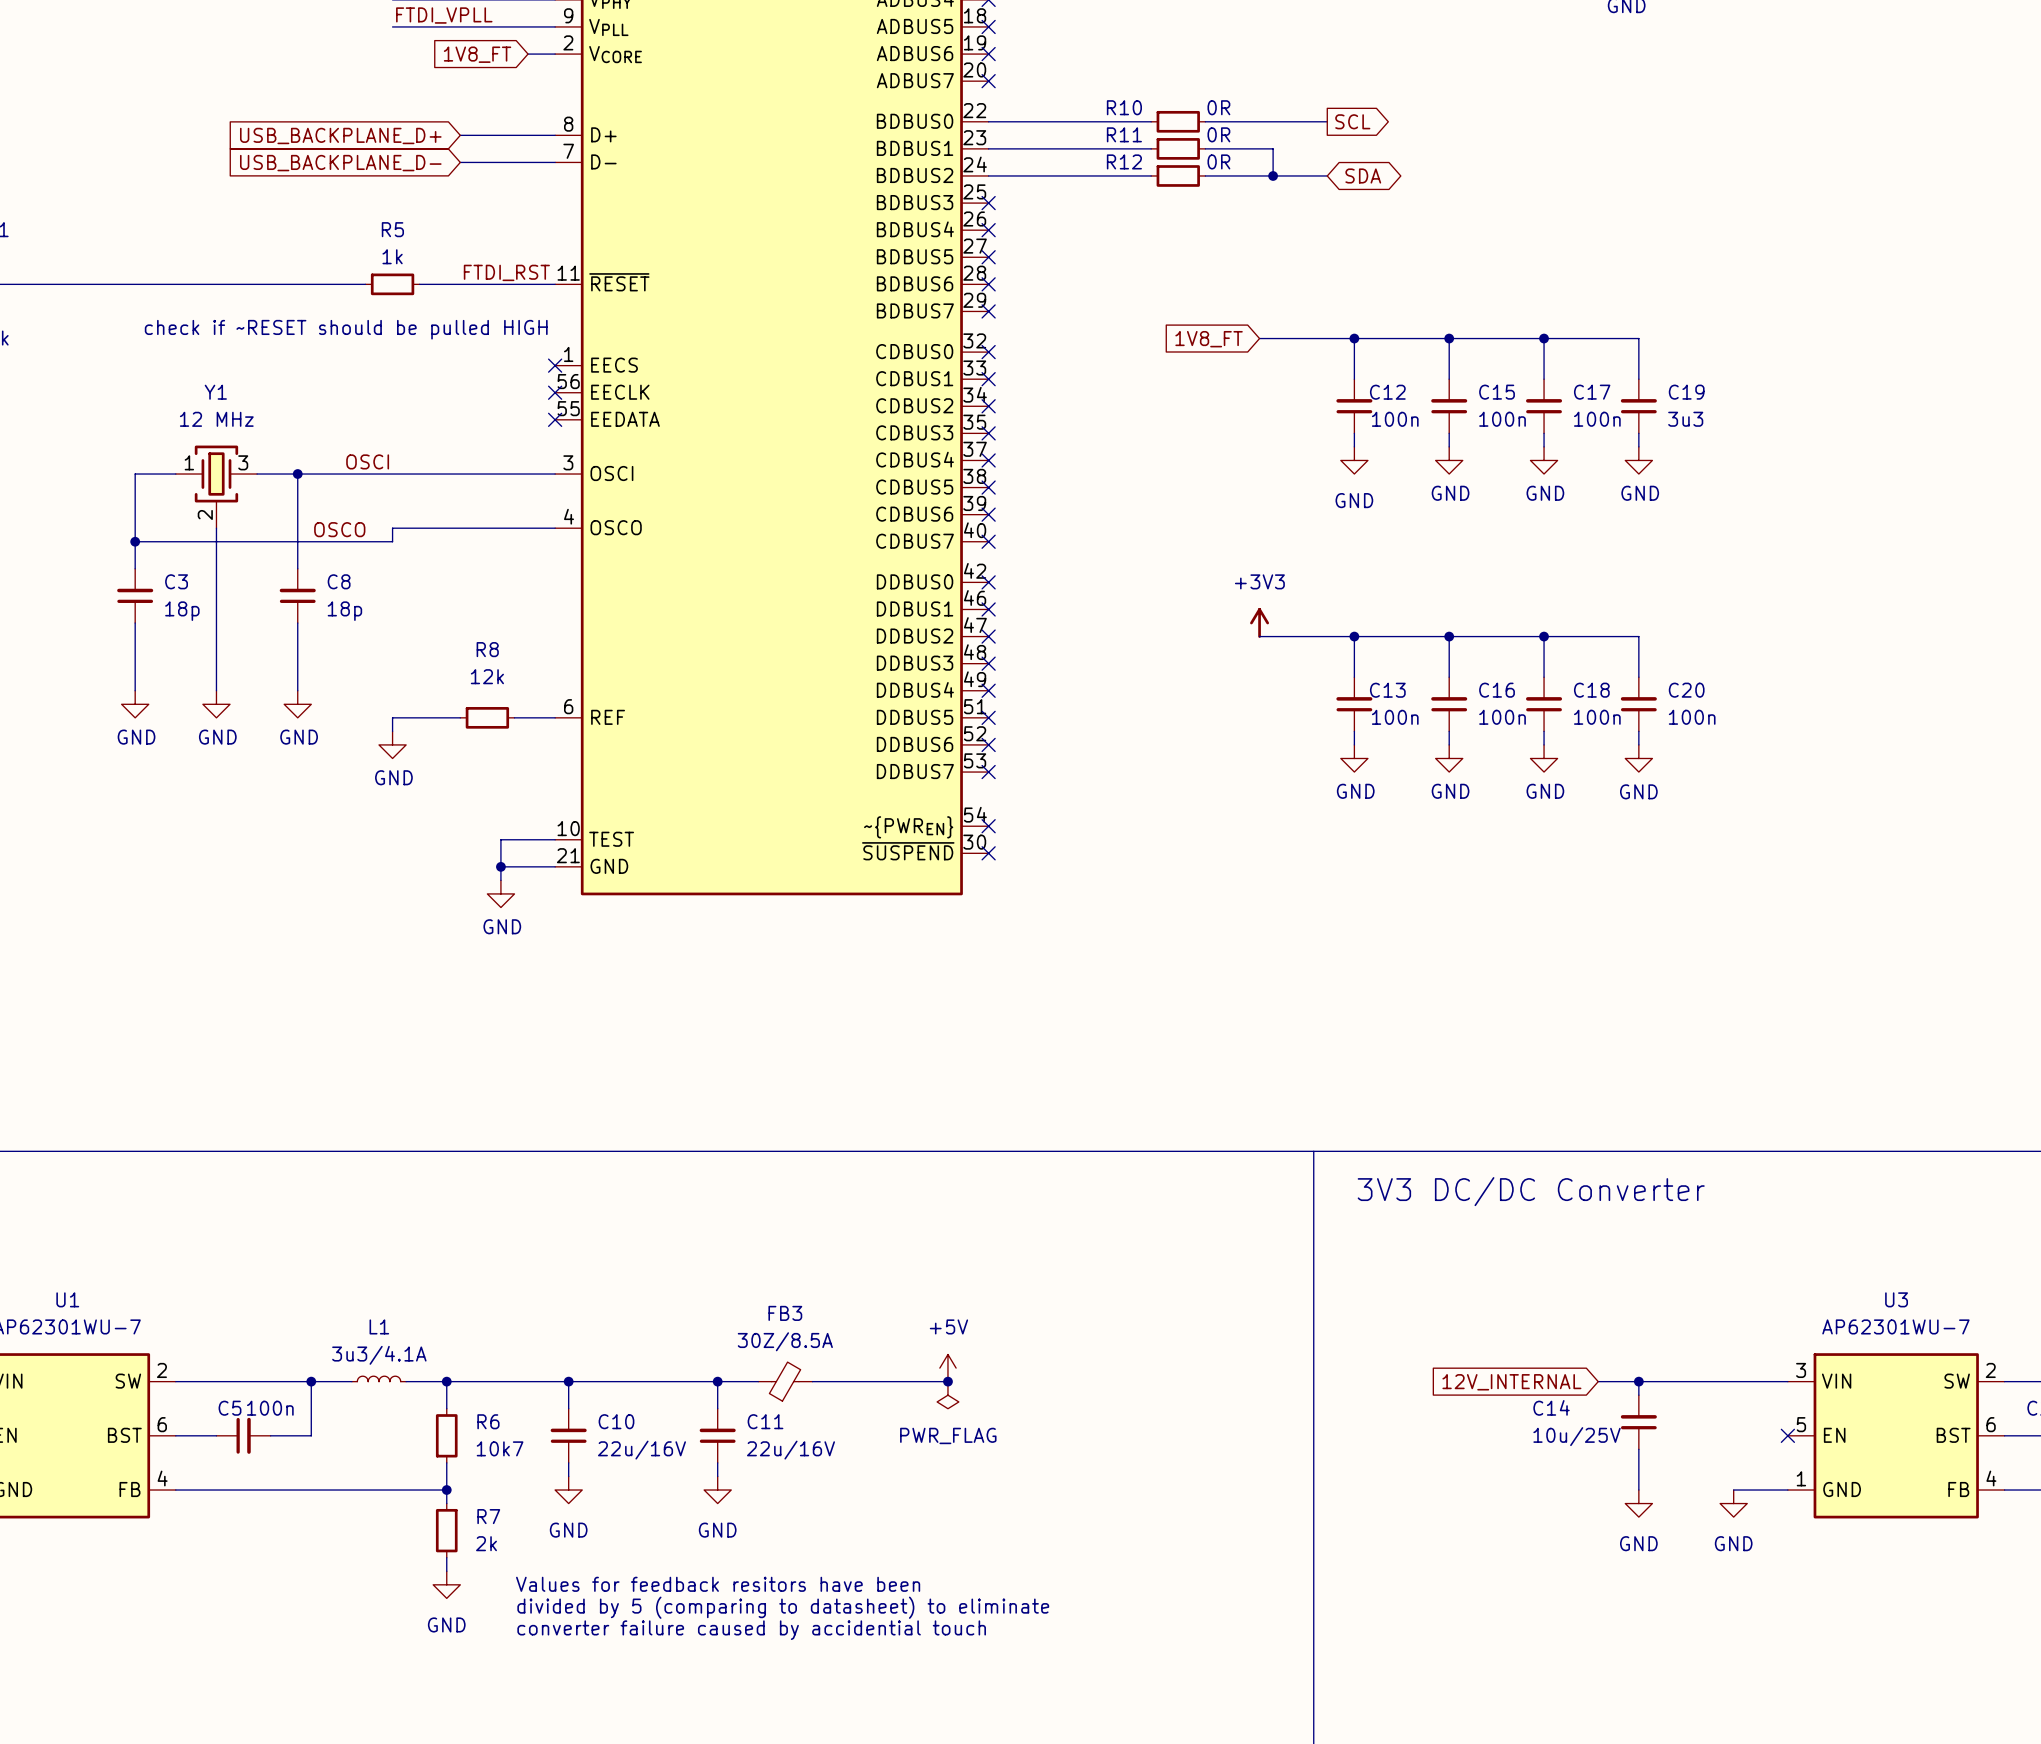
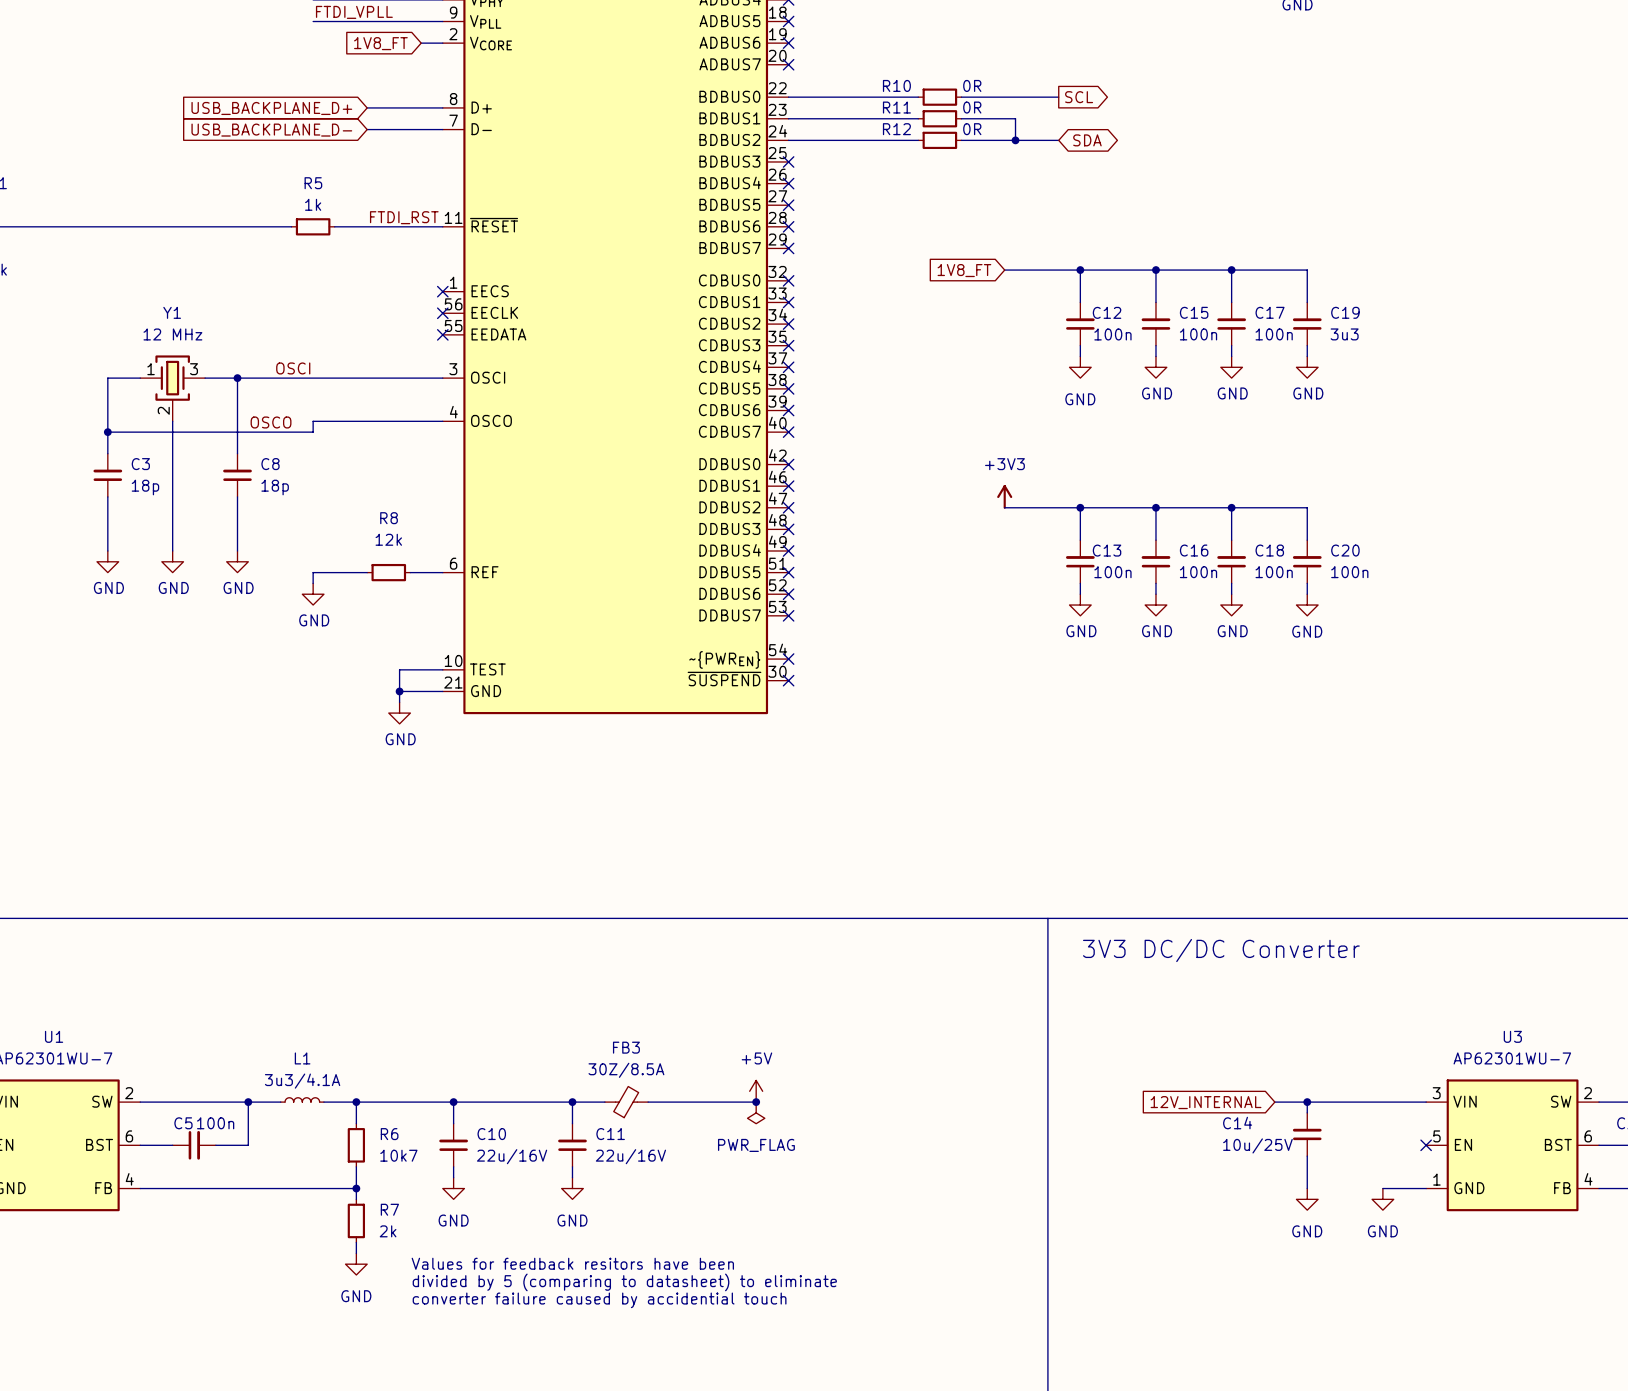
text: check if ~RESET should be pulled HIGH (346, 329) -> none

